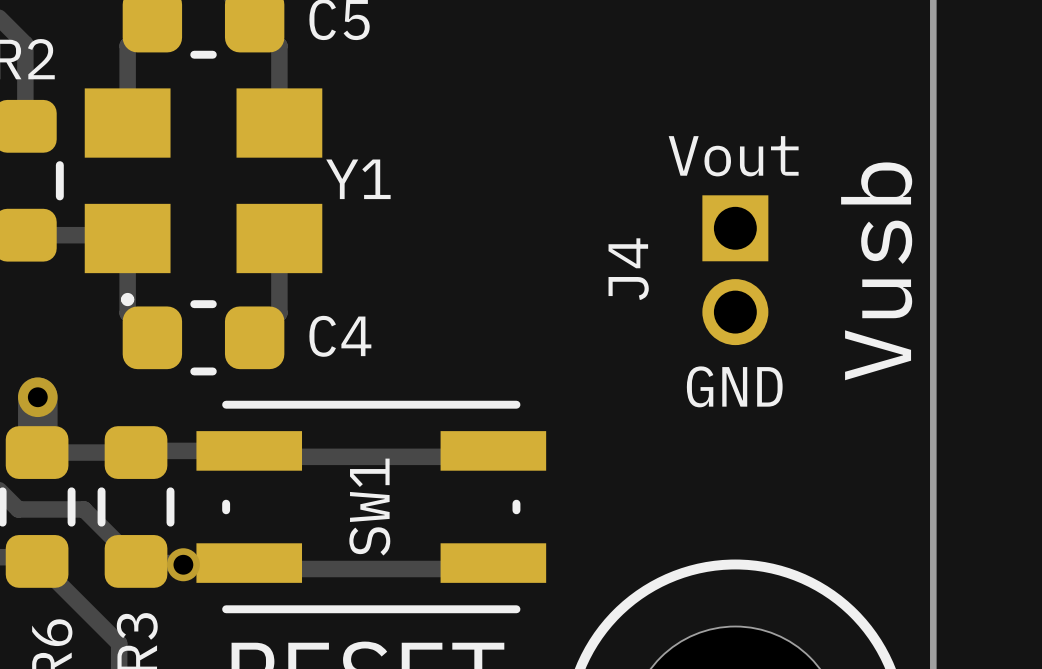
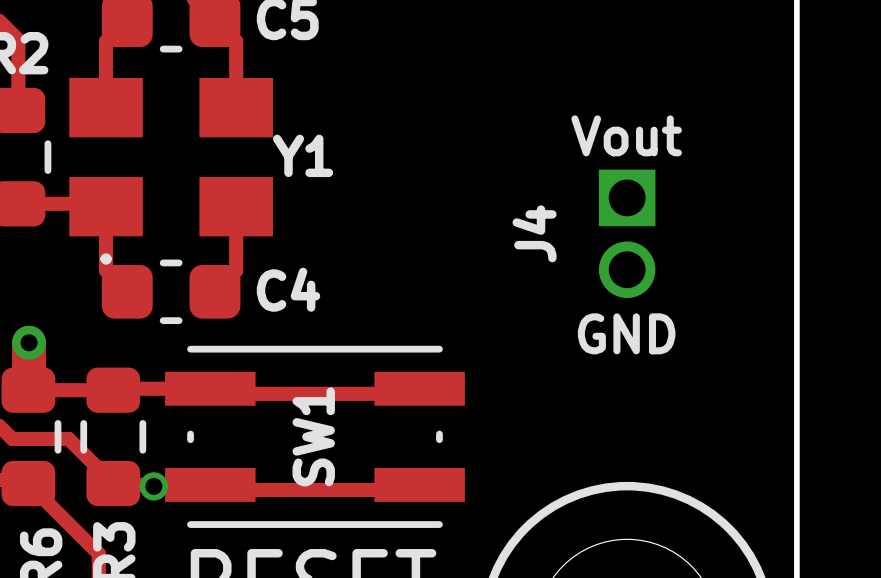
text: Vusb (876, 271) -> none

